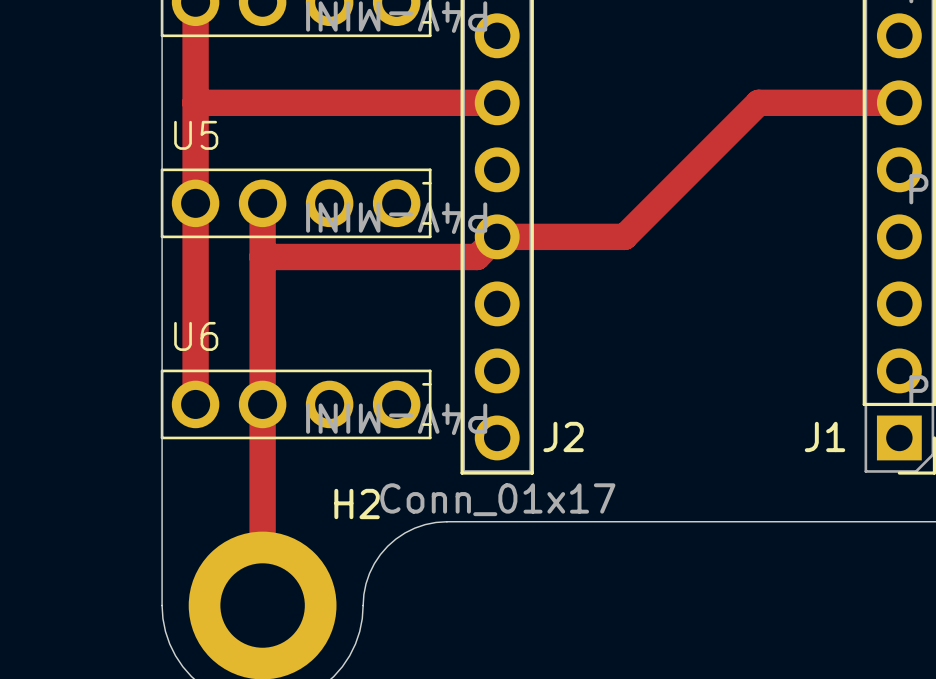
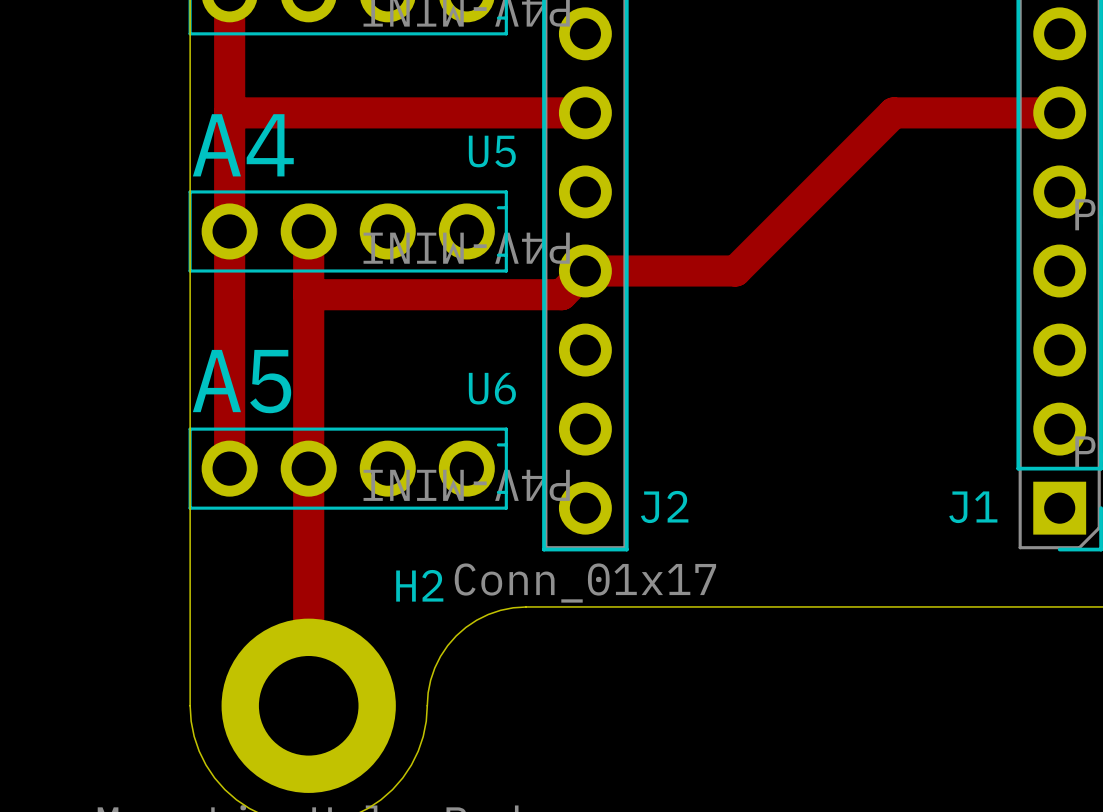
text: none -> A4 (243, 145)
U5 name position: U5 (196, 135) -> U5 (492, 151)
text: none -> A5 (242, 381)
U6 name position: U6 (196, 336) -> U6 (492, 388)

